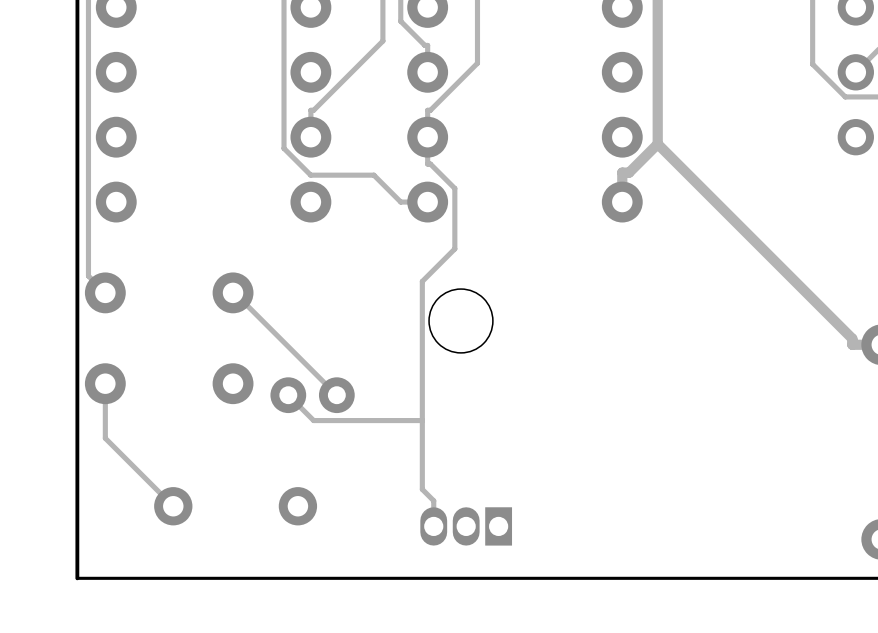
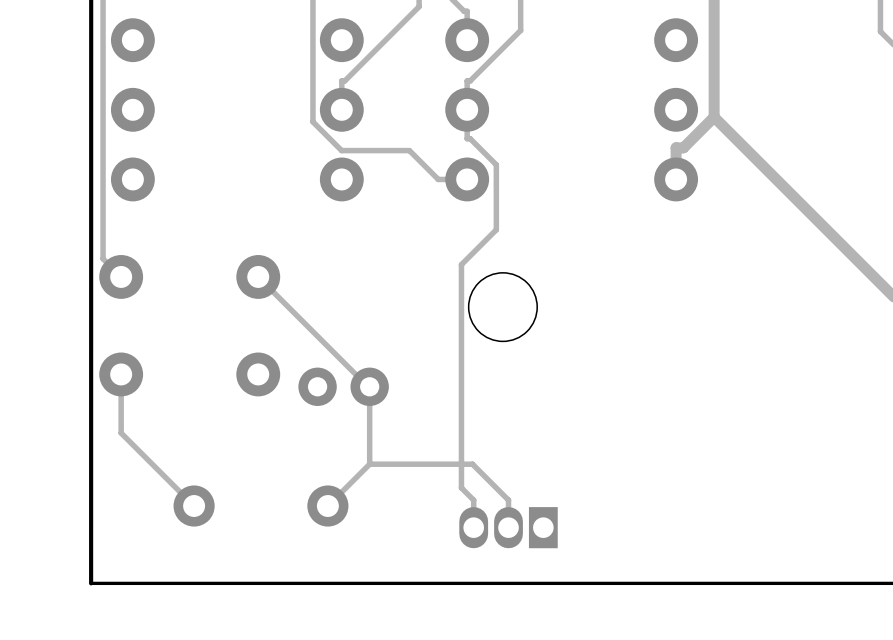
track: (233, 292) (336, 395) -> (258, 276) (369, 386) (369, 464)
track: (288, 395) (313, 420) (422, 420) -> none
track: none -> (369, 464) (327, 506)
track: none -> (369, 464) (472, 464) (508, 500) (508, 527)

